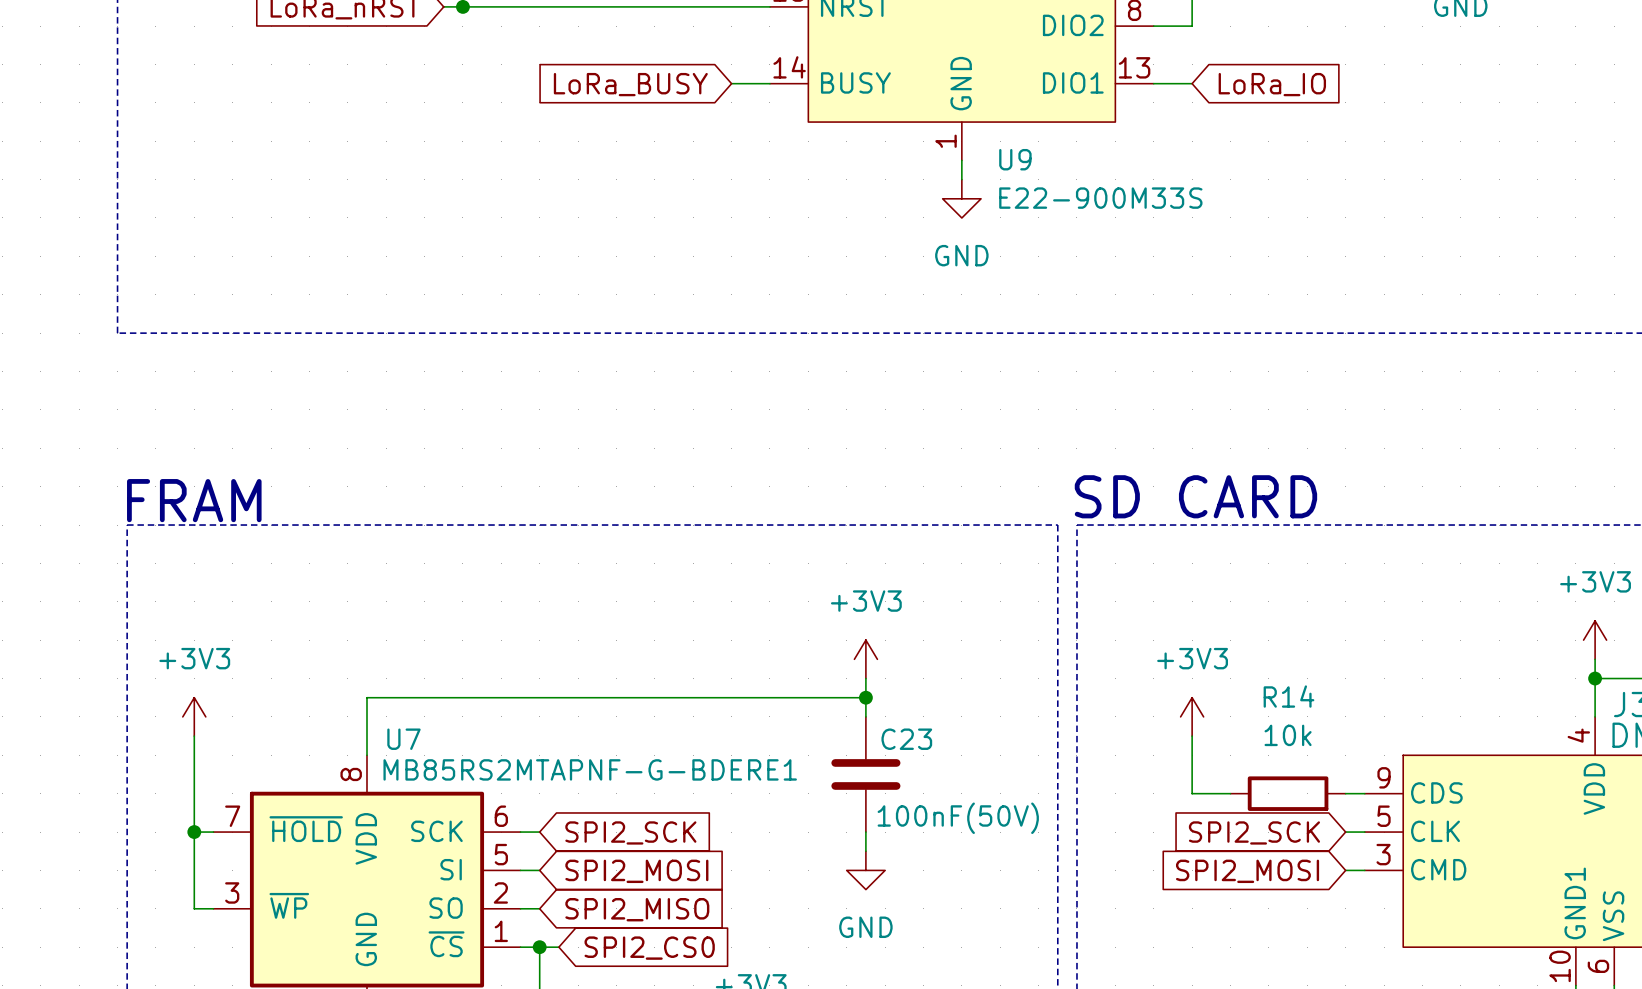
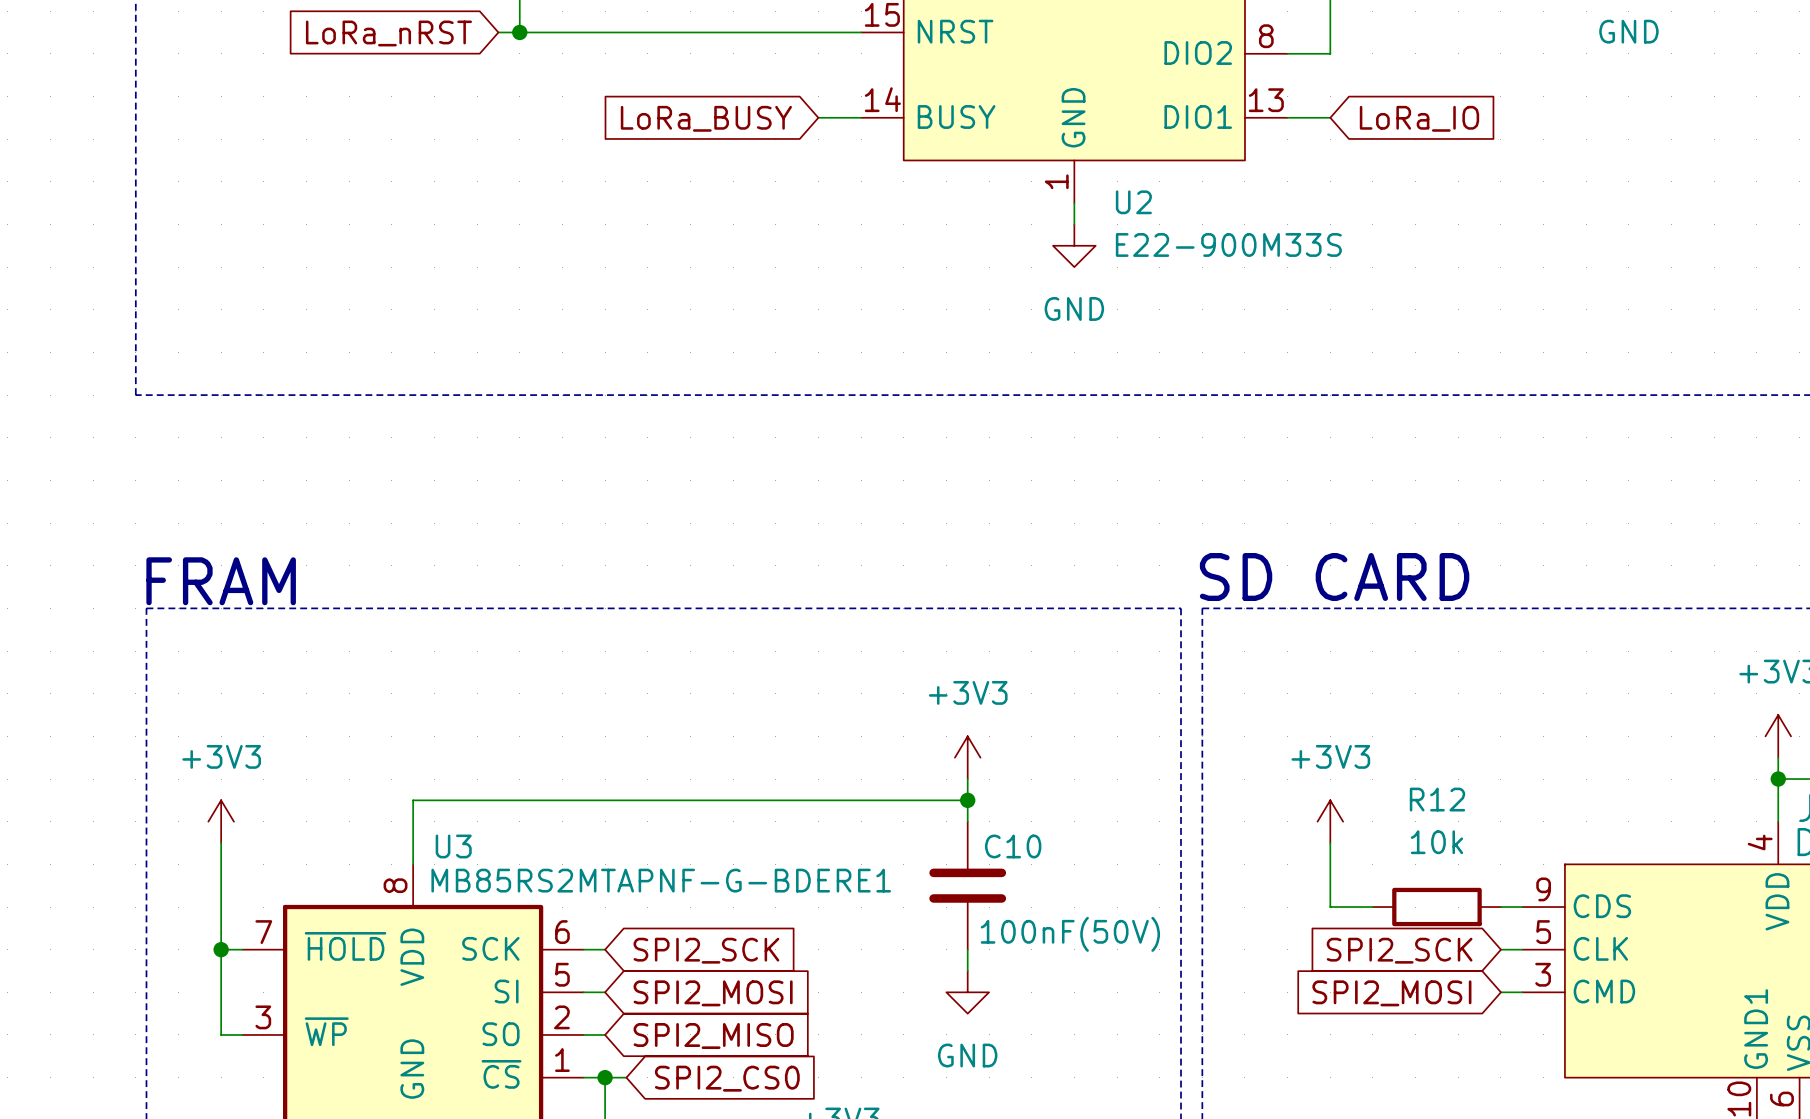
U9 name: U9 (1015, 159) -> U2 (1133, 202)
R14 name: R14 (1288, 696) -> R12 (1437, 799)
U7 name: U7 (403, 739) -> U3 (453, 846)
C23 name: C23 (906, 739) -> C10 (1013, 846)

